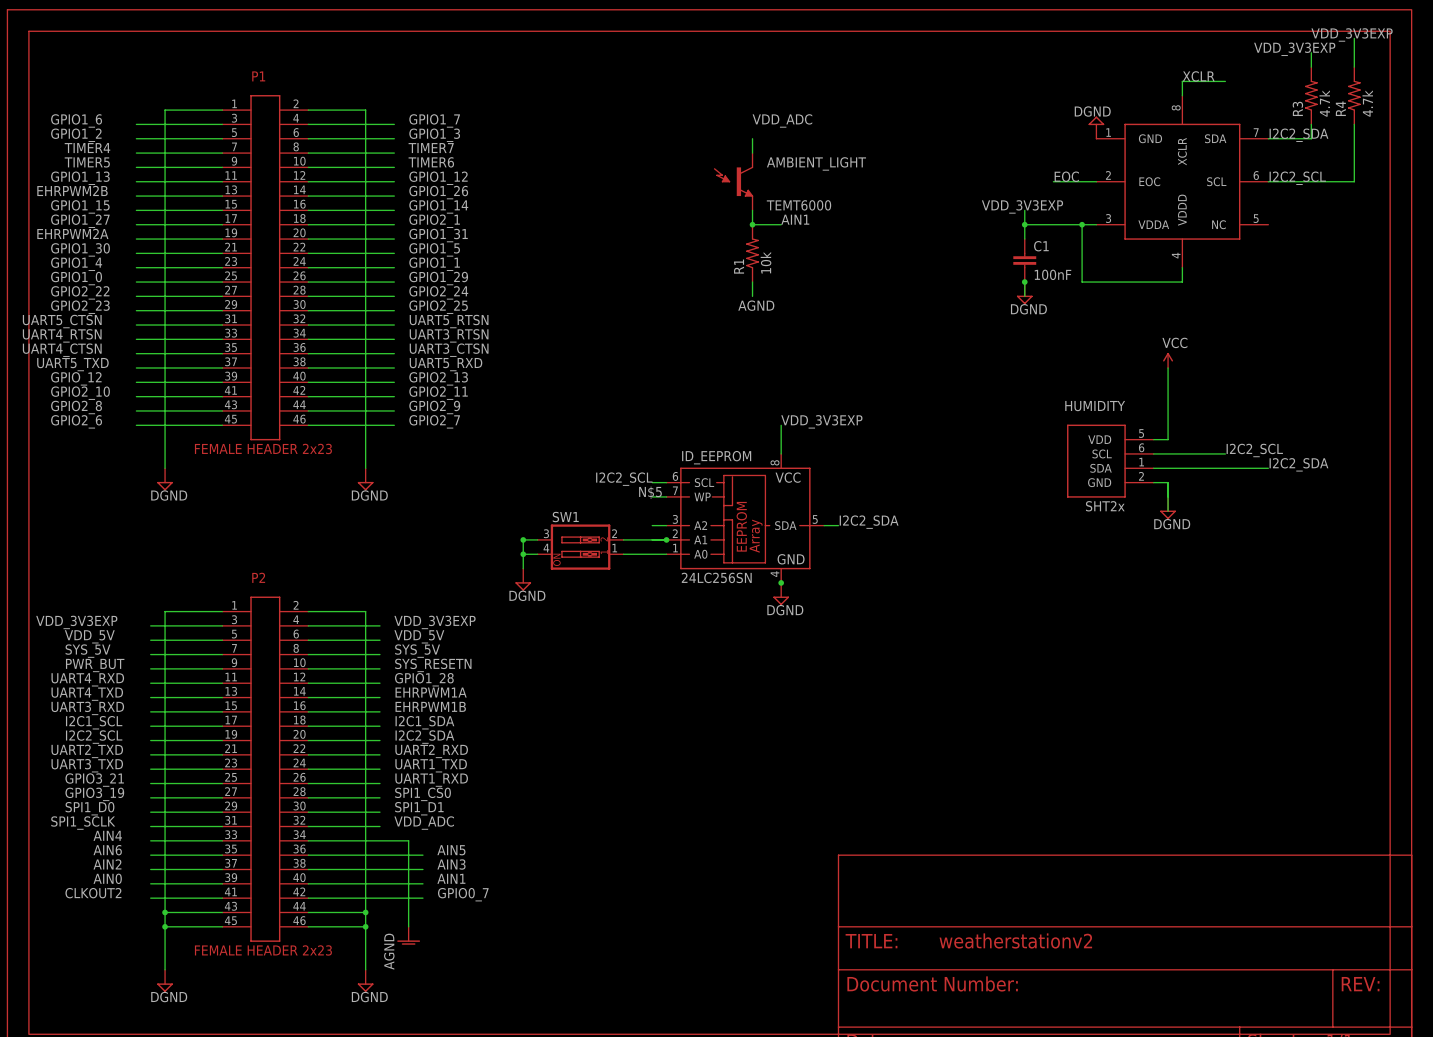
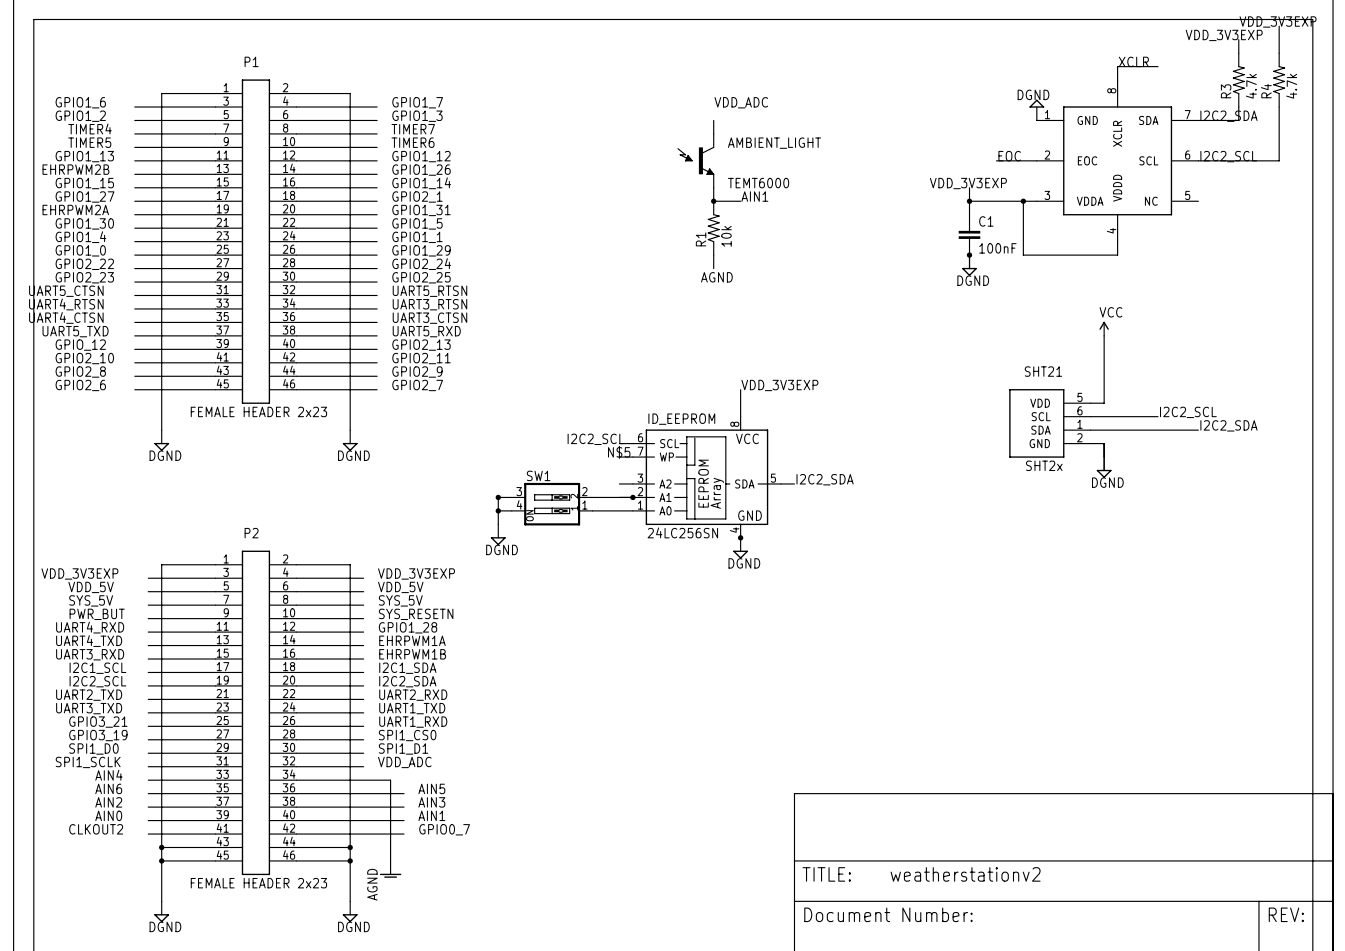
HUMIDITY name: HUMIDITY (1095, 406) -> SHT21 (1043, 371)

